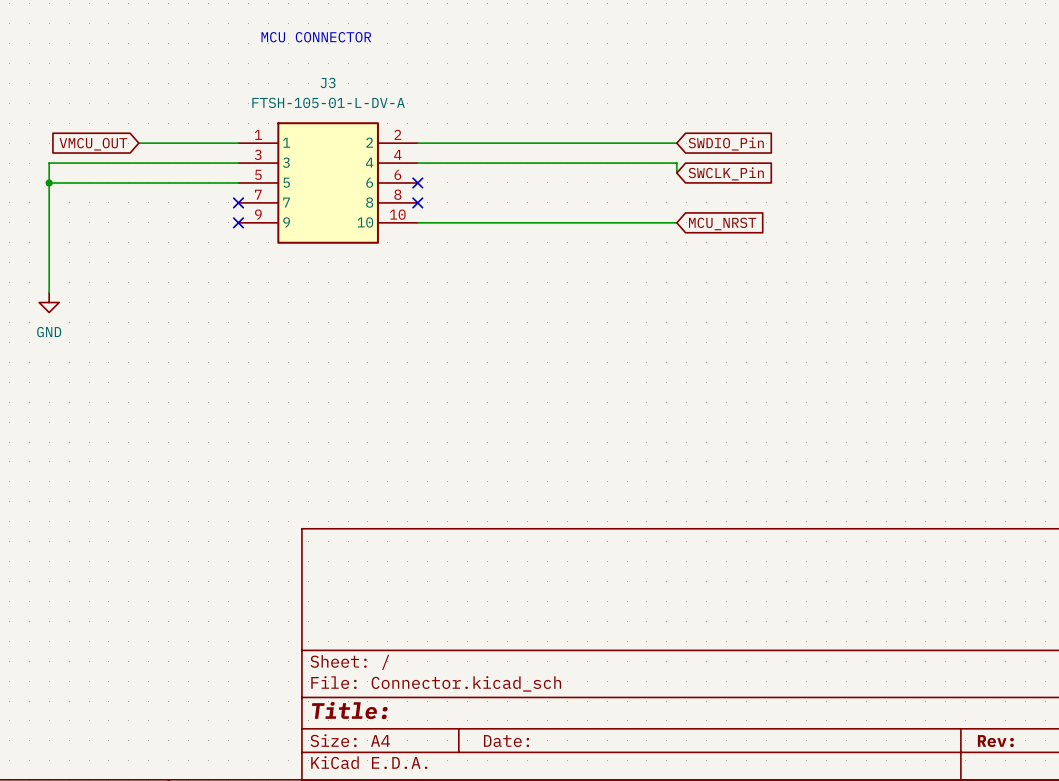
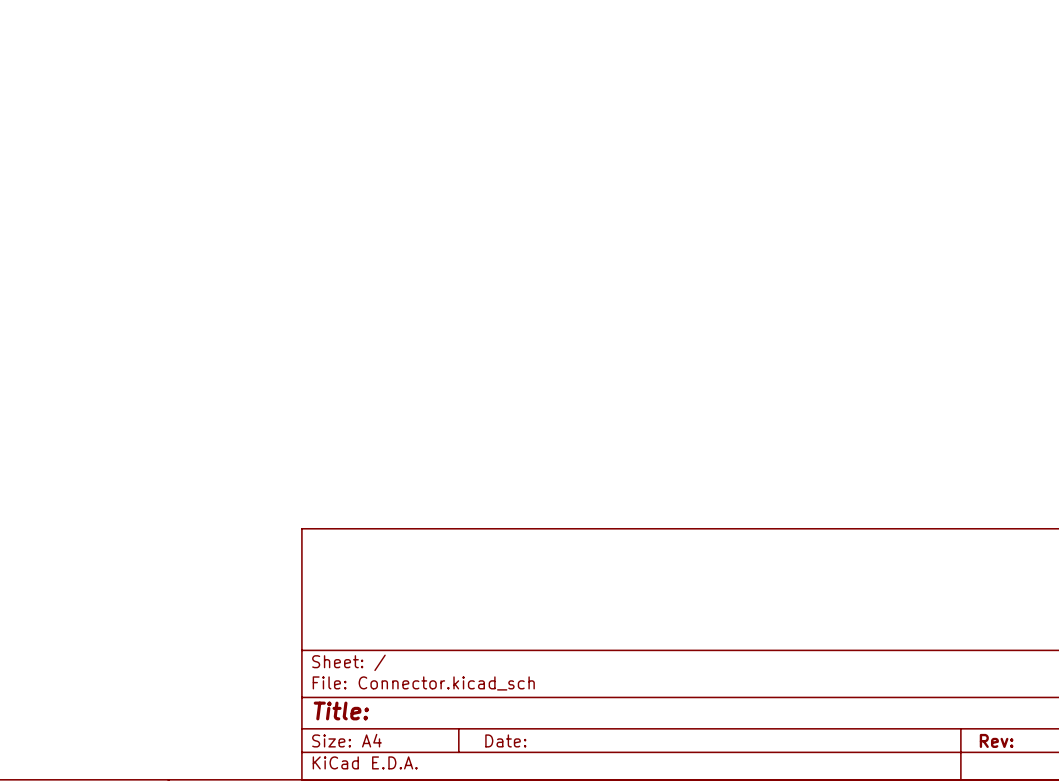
text: MCU CONNECTOR (316, 37) -> none
wire: (138, 143) (238, 143) -> none
wire: (417, 143) (676, 143) -> none
global label: SWDIO_Pin (726, 143) -> none
global label: VMCU_OUT (93, 144) -> none
wire: (238, 163) (49, 163) (49, 292) -> none
wire: (417, 163) (676, 163) (676, 173) -> none
global label: SWCLK_Pin (726, 173) -> none
wire: (49, 182) (238, 182) -> none
junction: (49, 182) -> none
J3: FTSH-105-01-L-DV-A (328, 182) -> none
no-connect mark: (417, 182) -> none
no-connect mark: (238, 202) -> none
no-connect mark: (417, 202) -> none
no-connect mark: (238, 222) -> none
wire: (417, 222) (676, 222) -> none
global label: MCU_NRST (722, 223) -> none
power symbol: GND (49, 302) -> none

